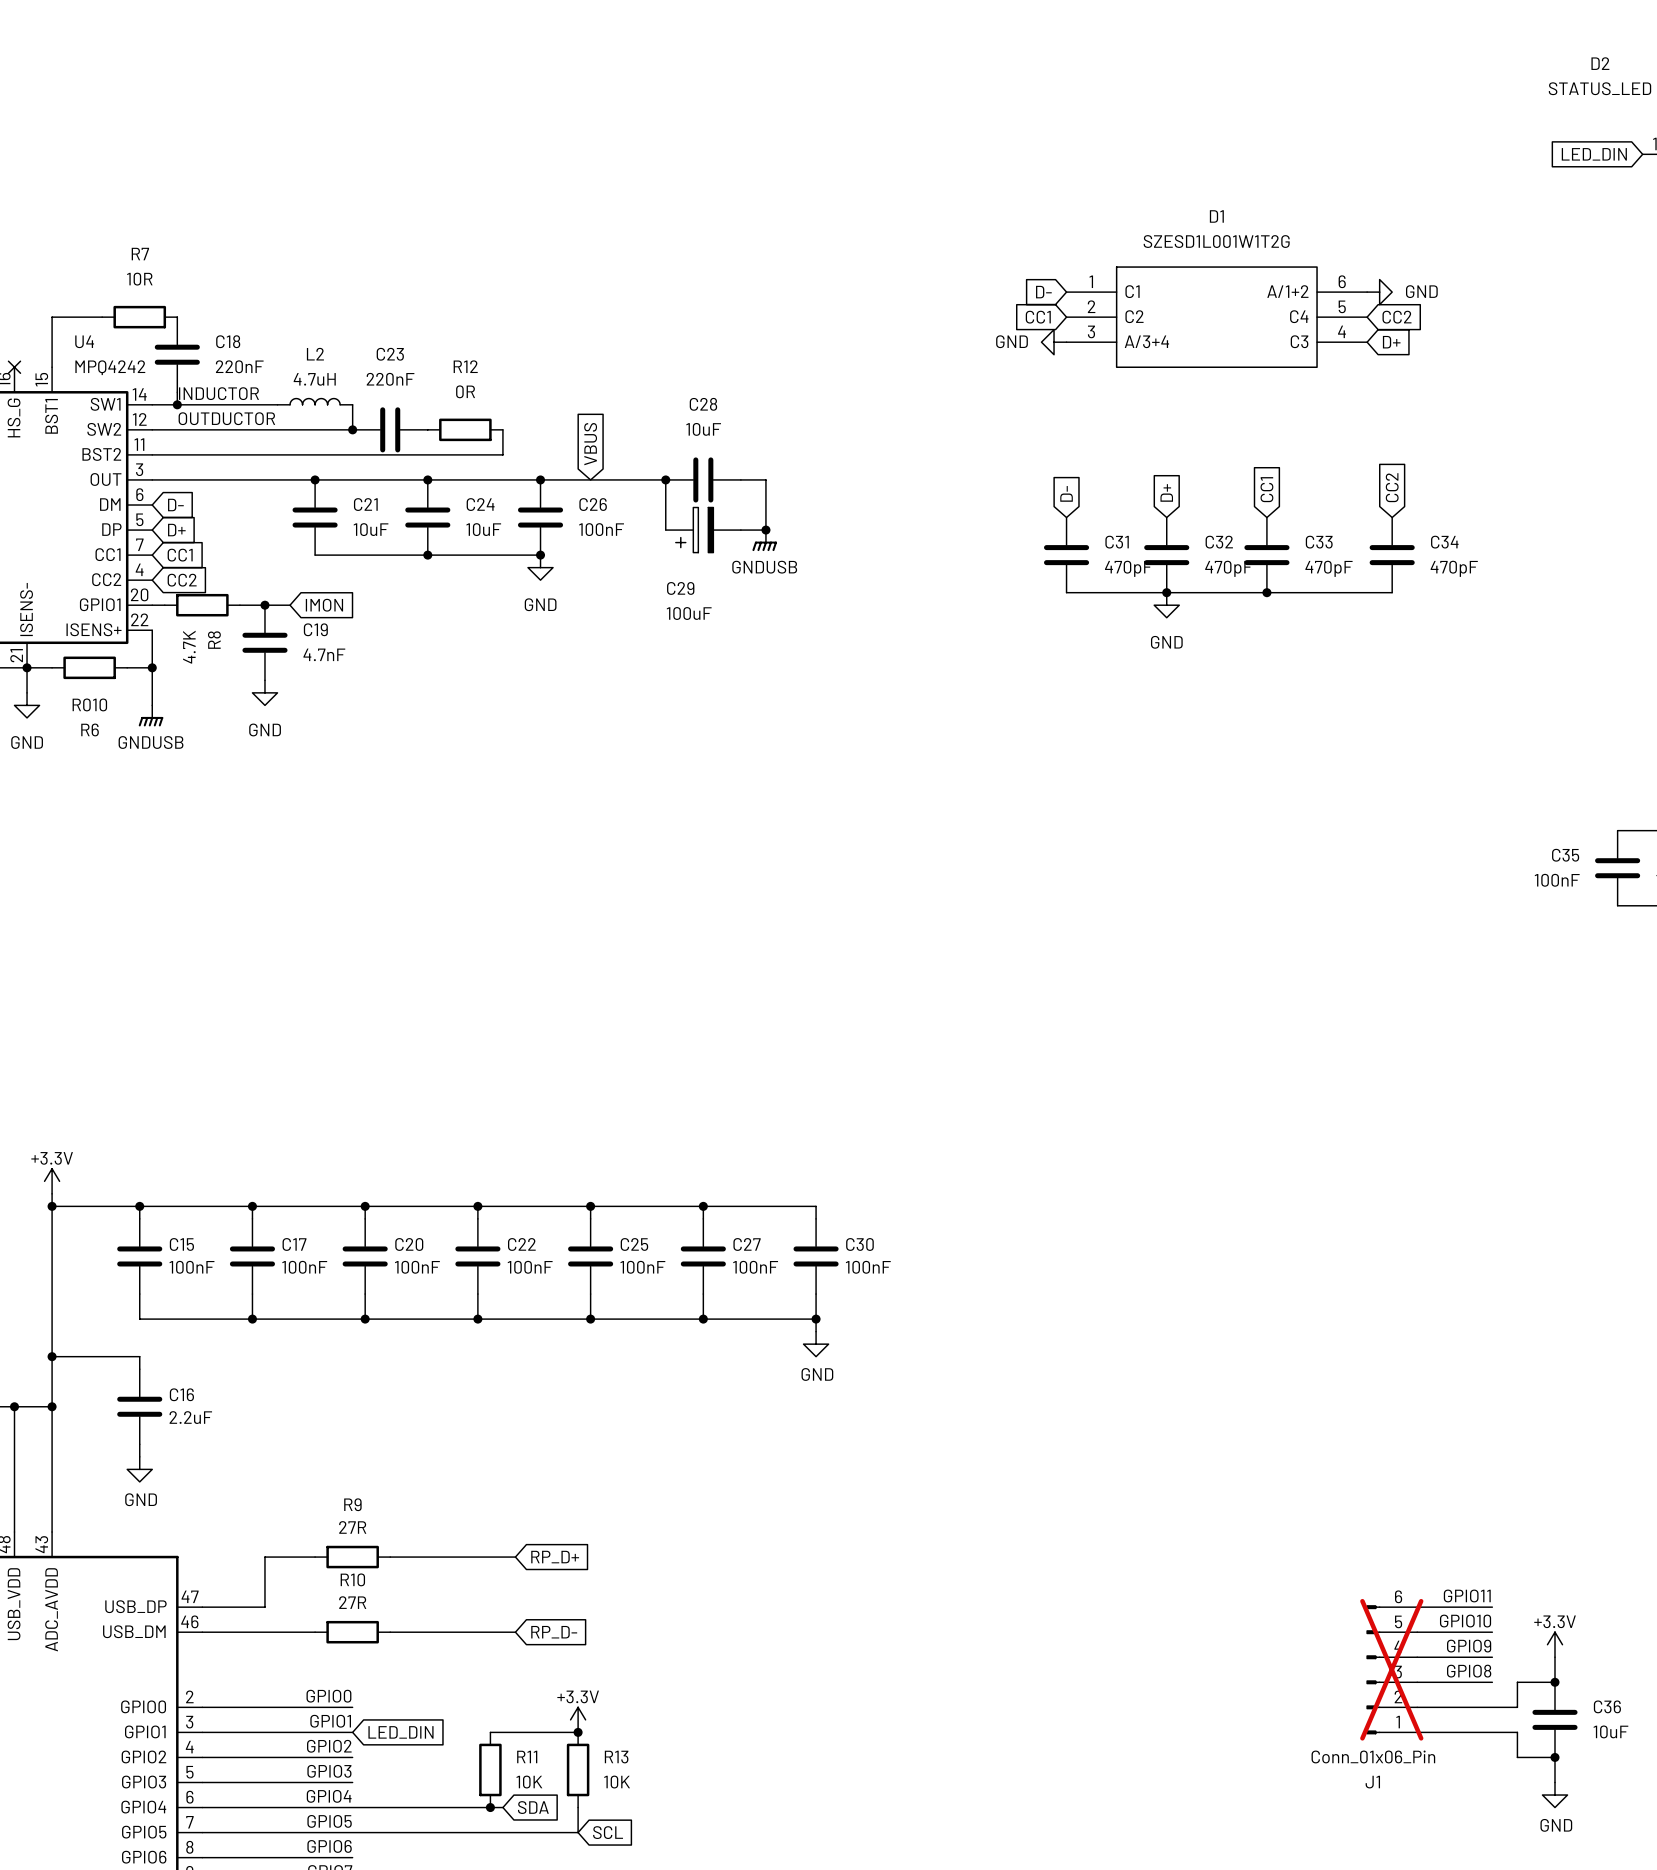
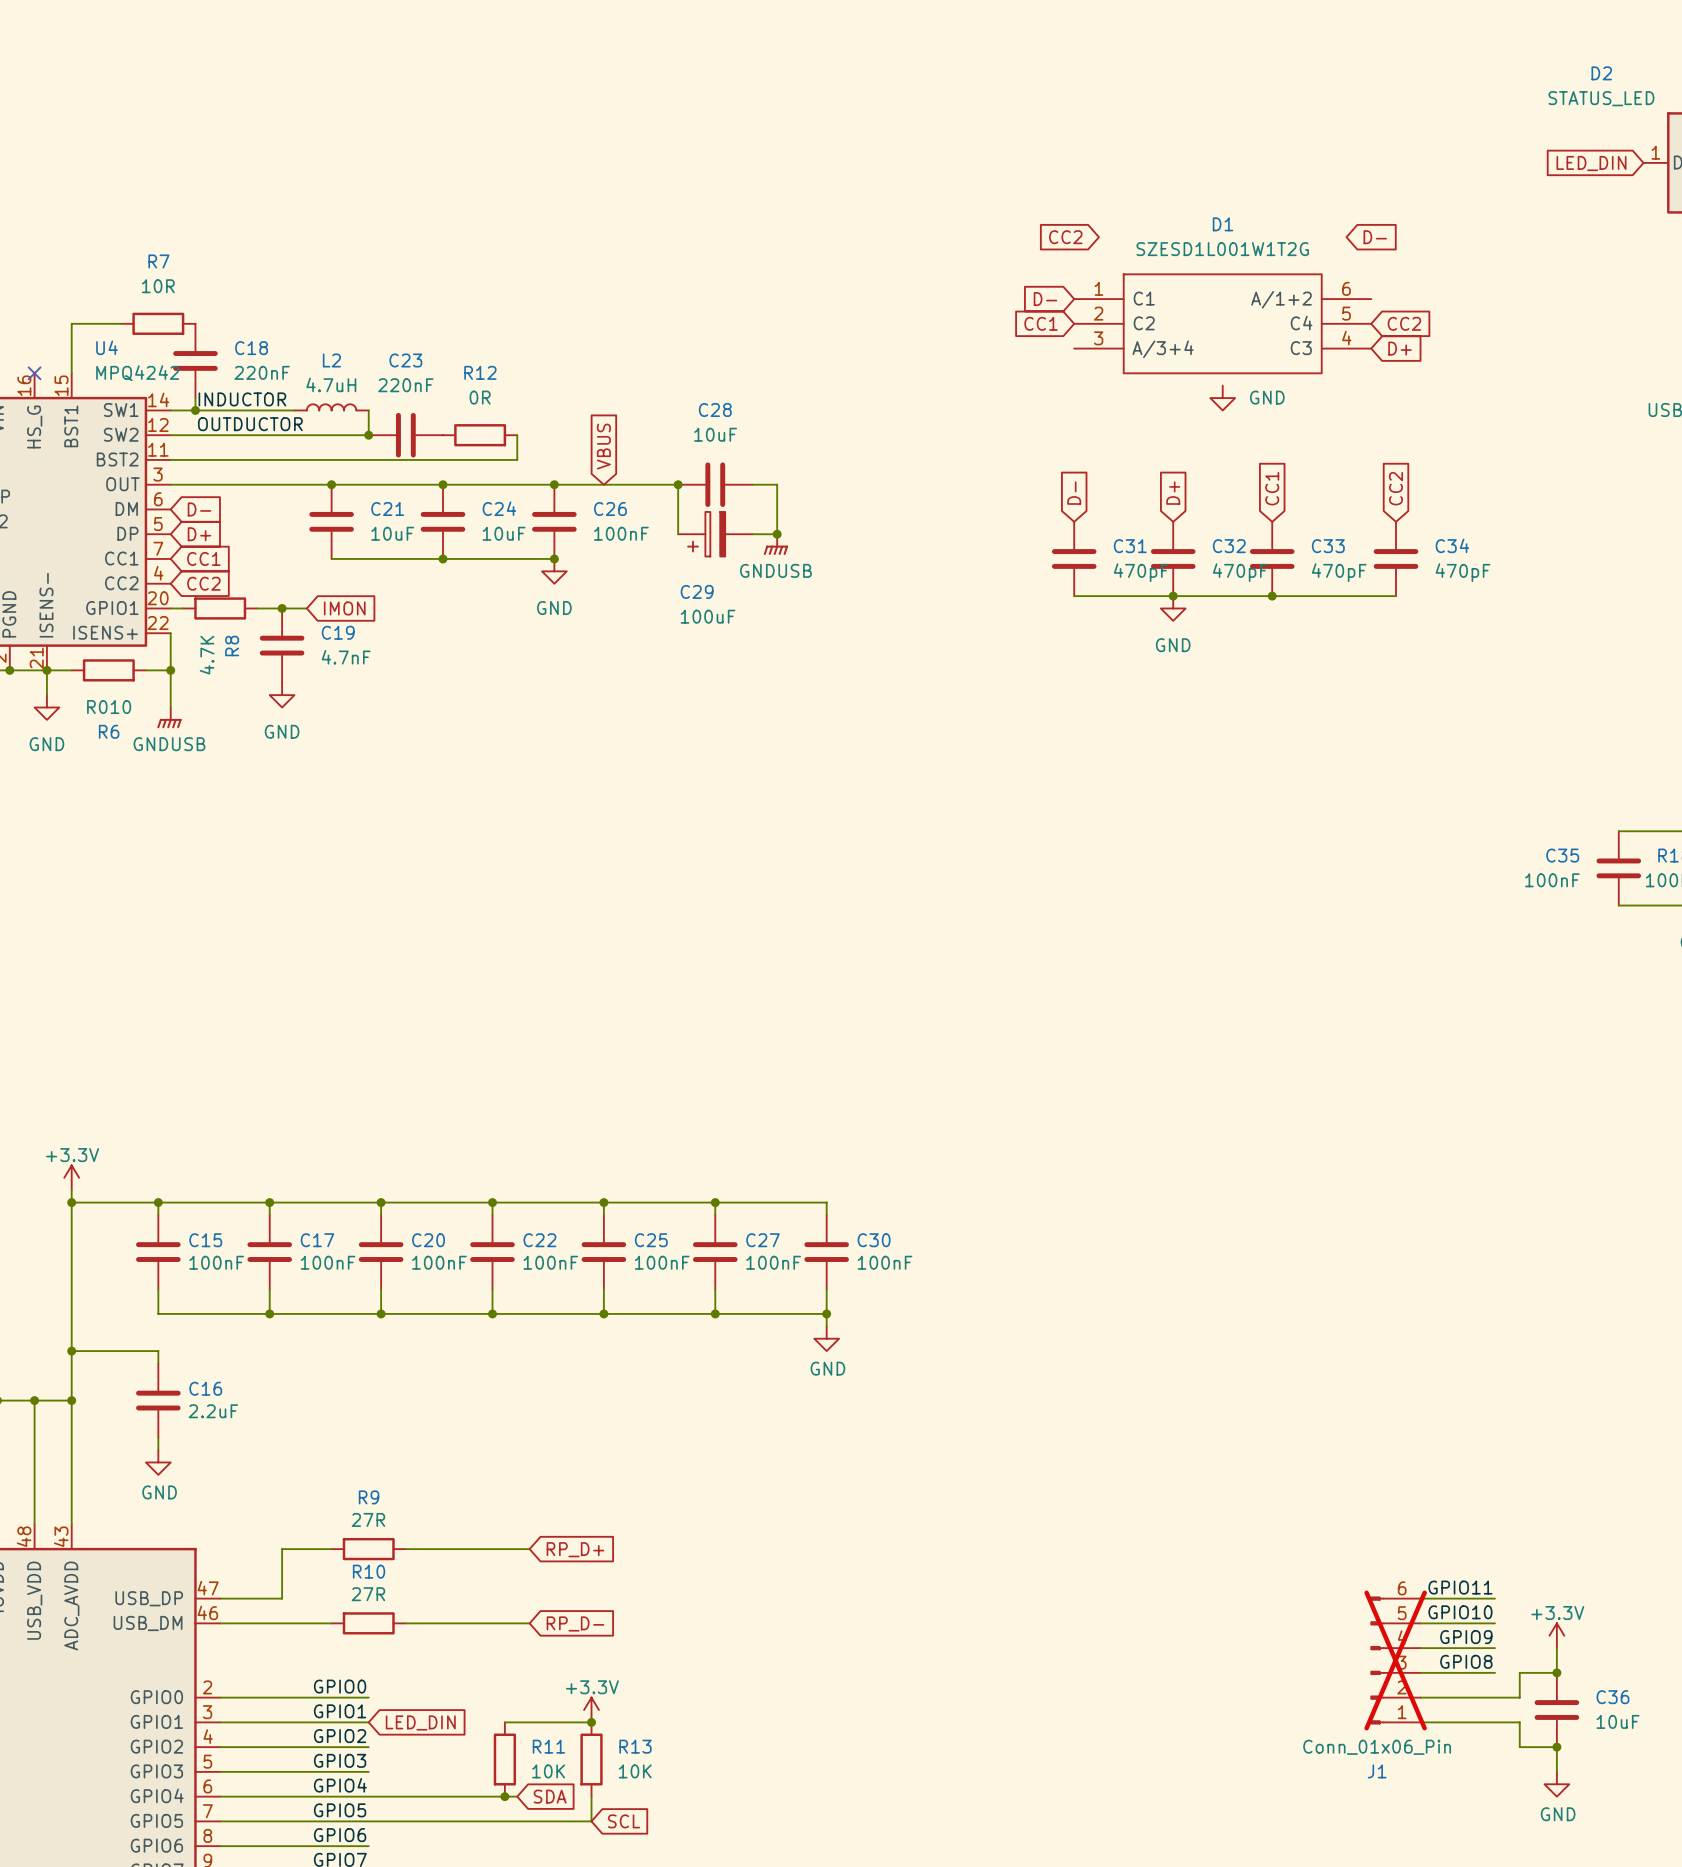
global label: none -> CC2 (1065, 237)
global label: none -> D- (1375, 237)
power symbol: GND (1379, 292) -> none
power symbol: GND (1054, 342) -> none
power symbol: none -> GND (1222, 398)

